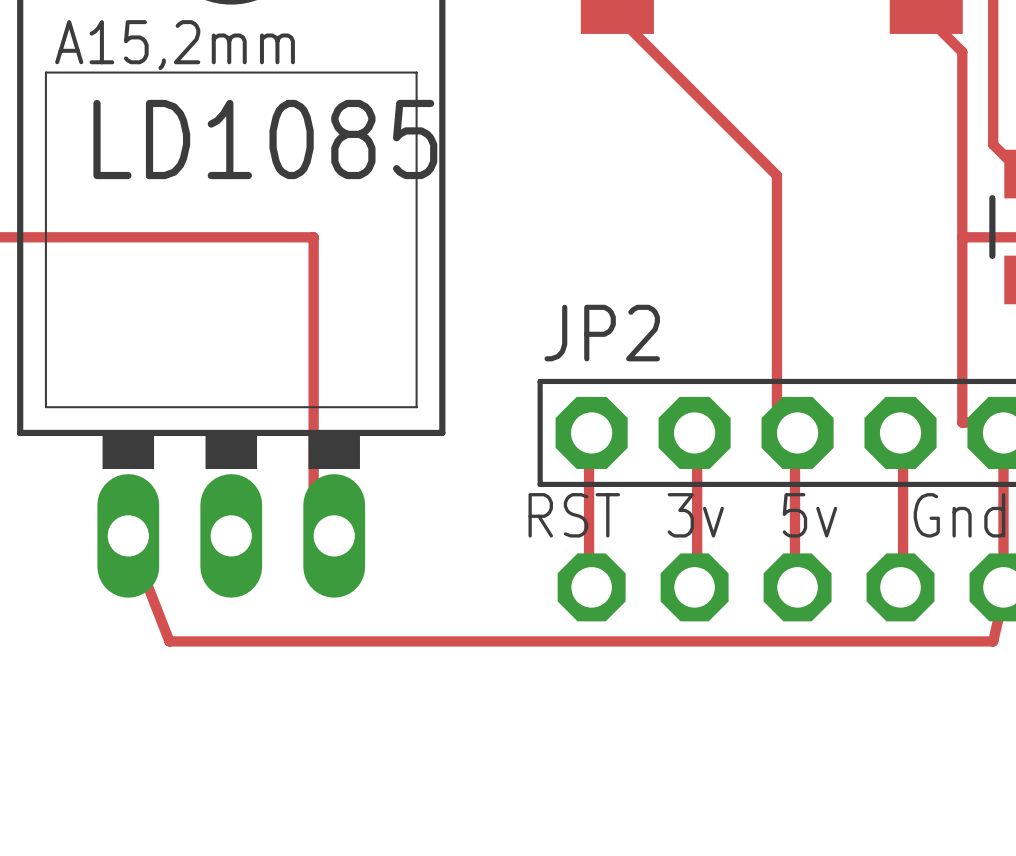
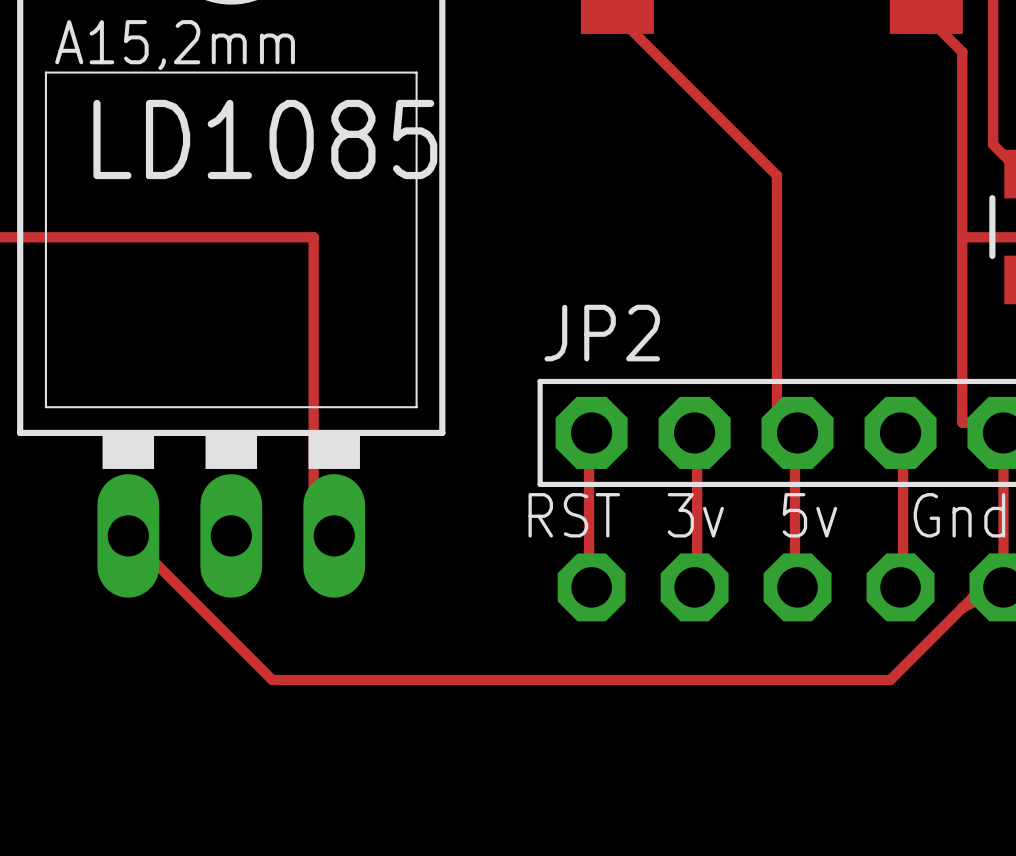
track: (128, 535) (169, 641) (993, 641) (1000, 607) -> (128, 535) (272, 680) (890, 680) (972, 597) (1003, 587) (962, 607)

